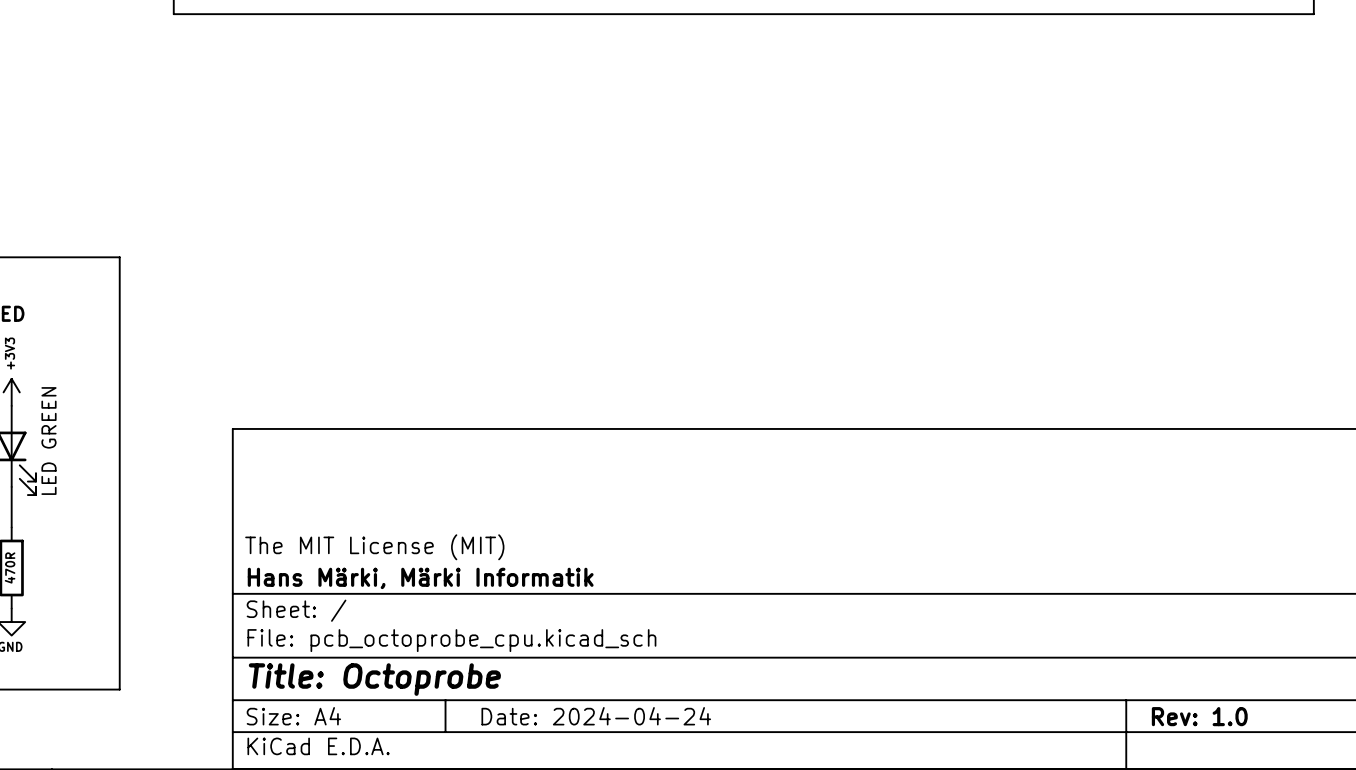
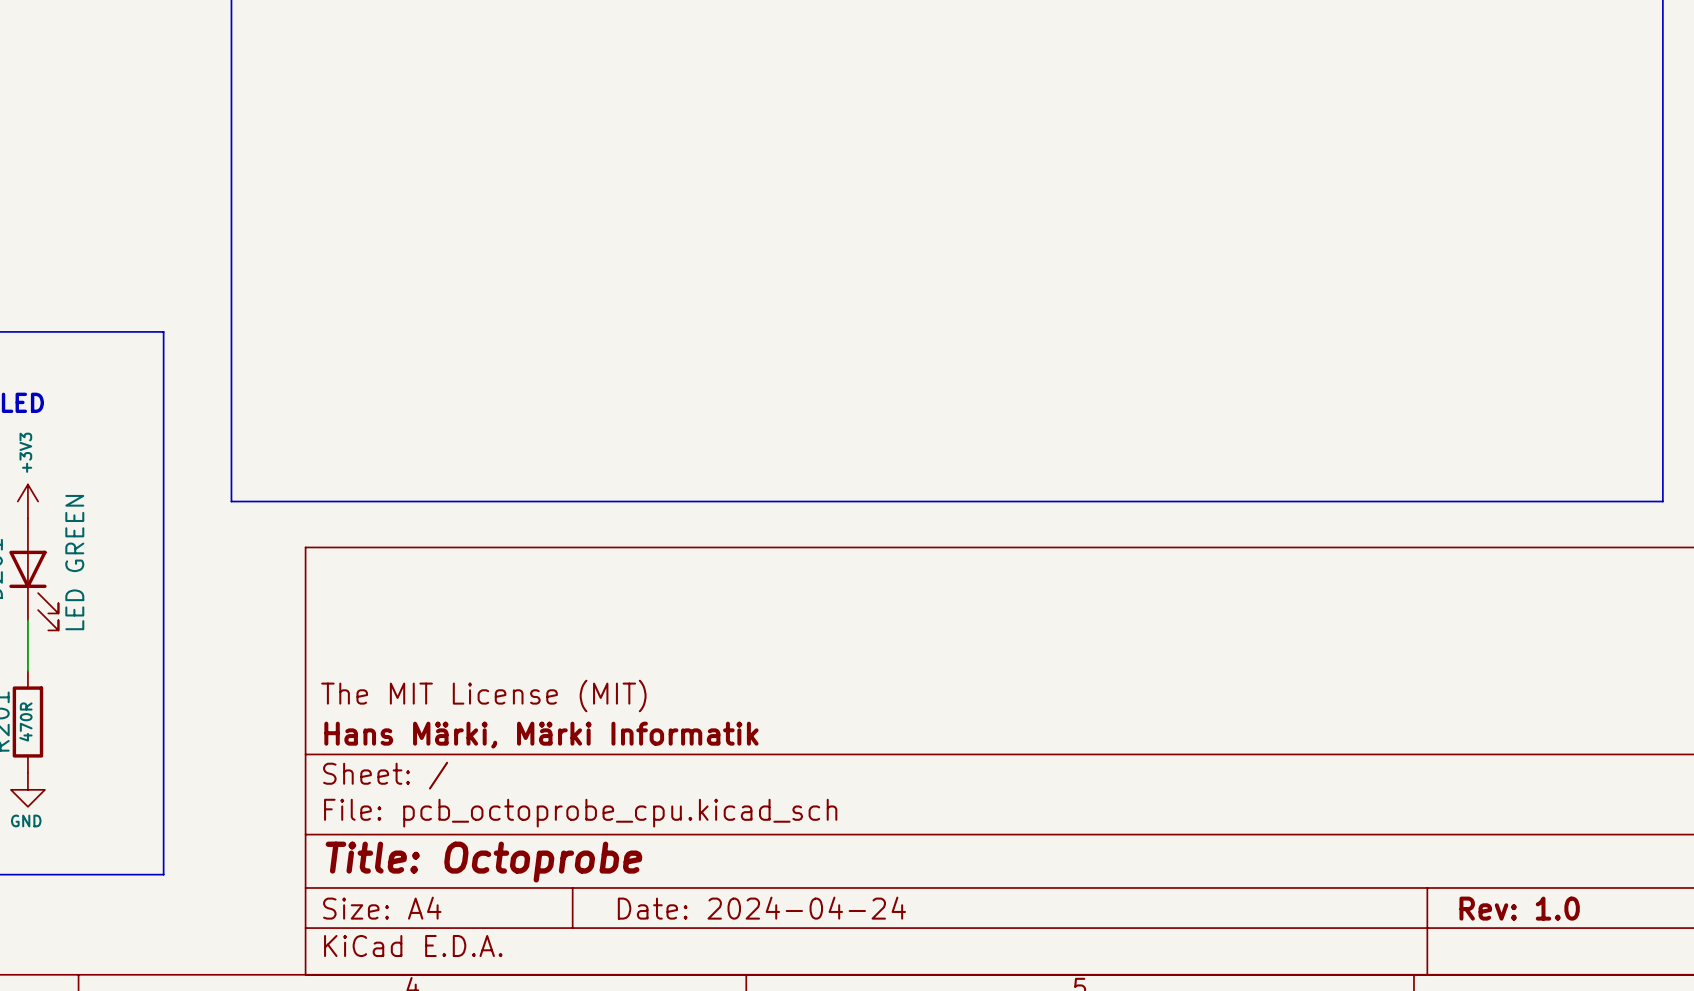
line: (173, 14) (1313, 14) -> (231, 26) (231, 501) (1662, 501) (1662, 26)

